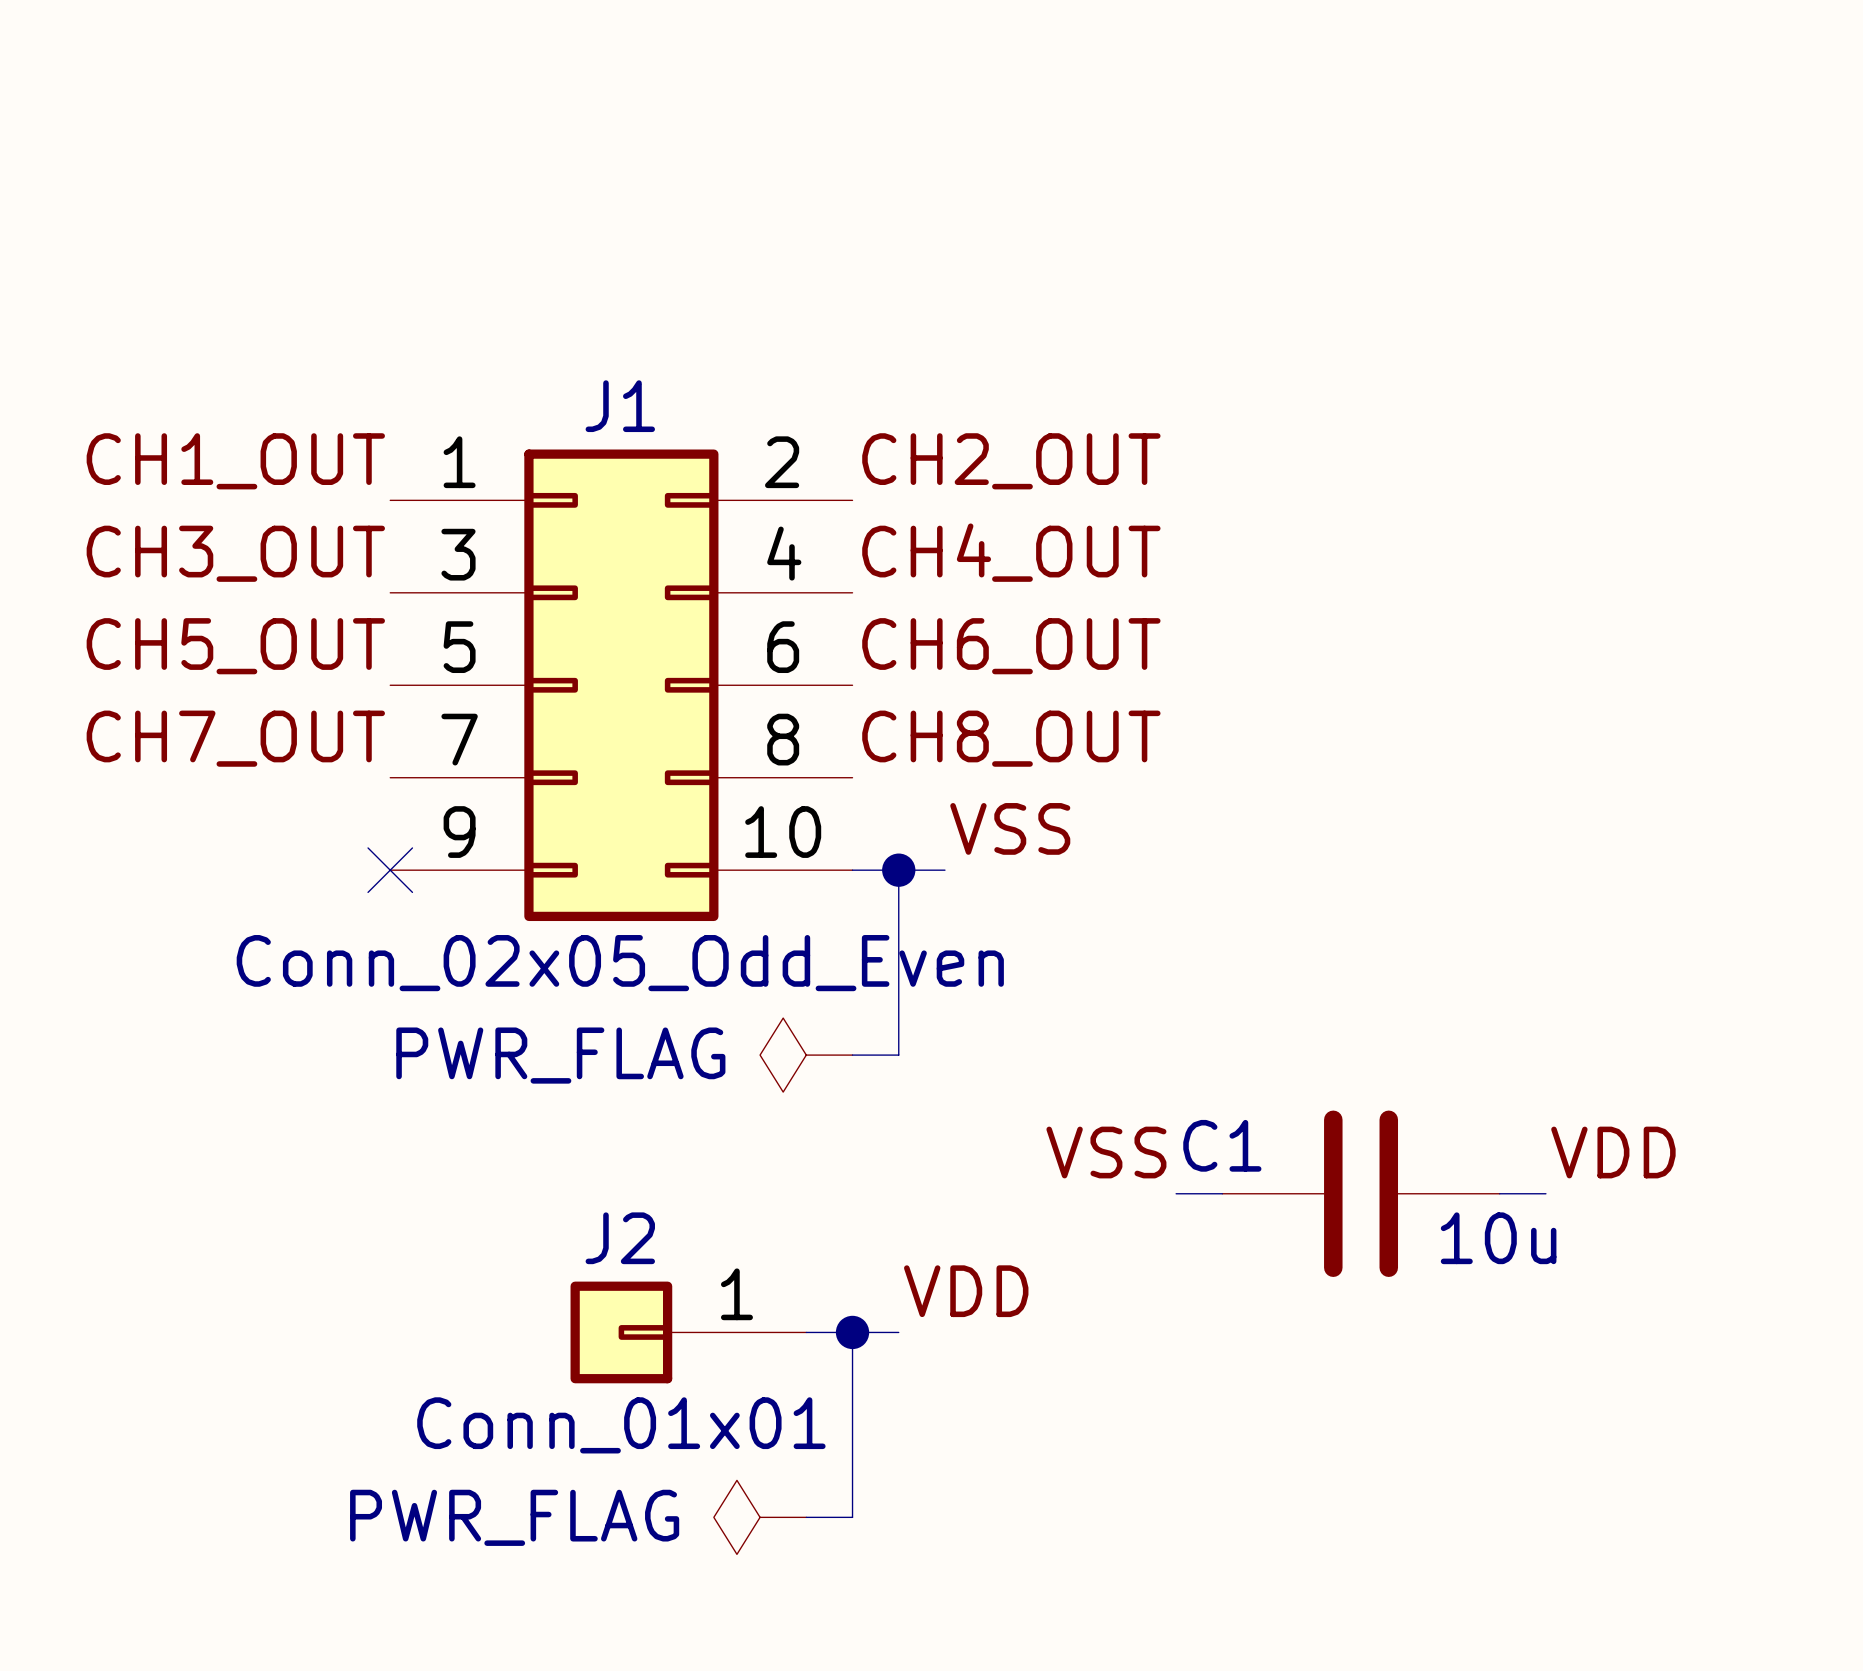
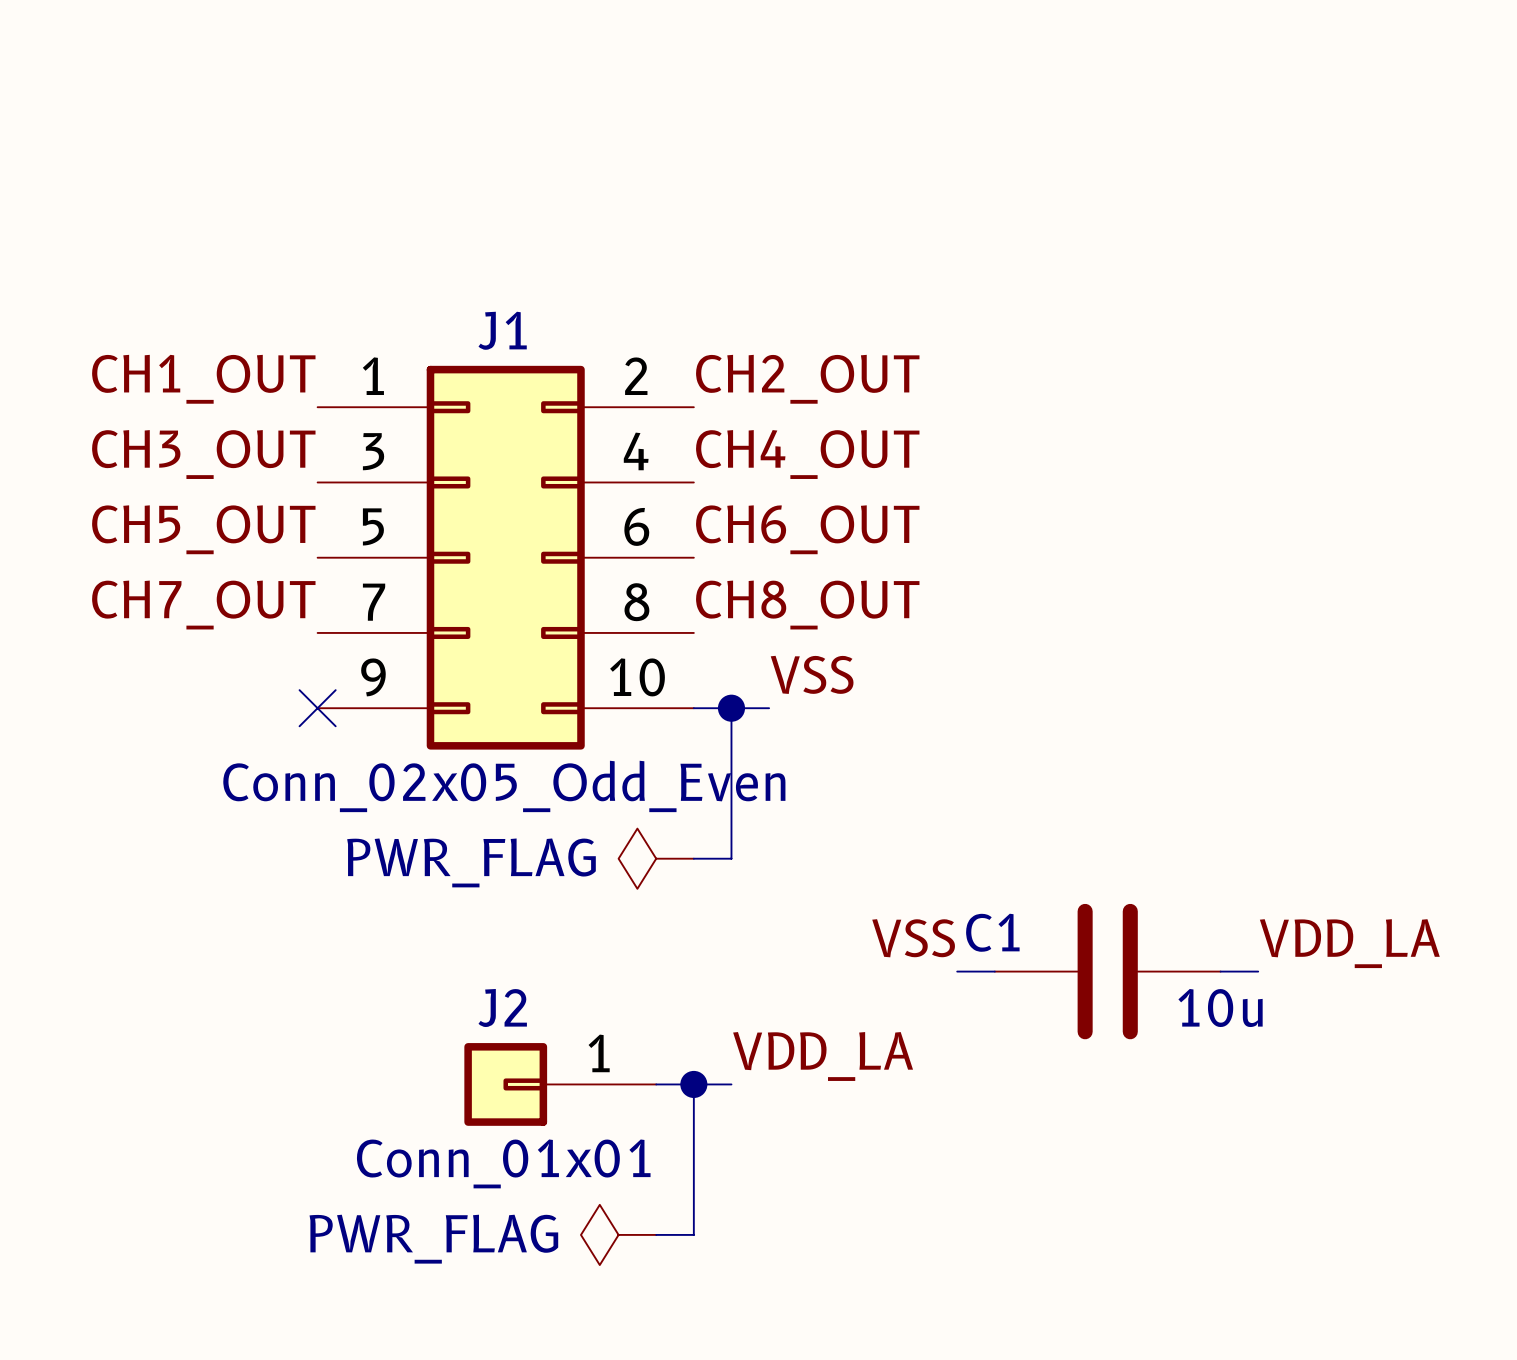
label: VDD (1613, 1152) -> VDD_LA (1349, 943)
label: VDD (966, 1291) -> VDD_LA (823, 1056)

